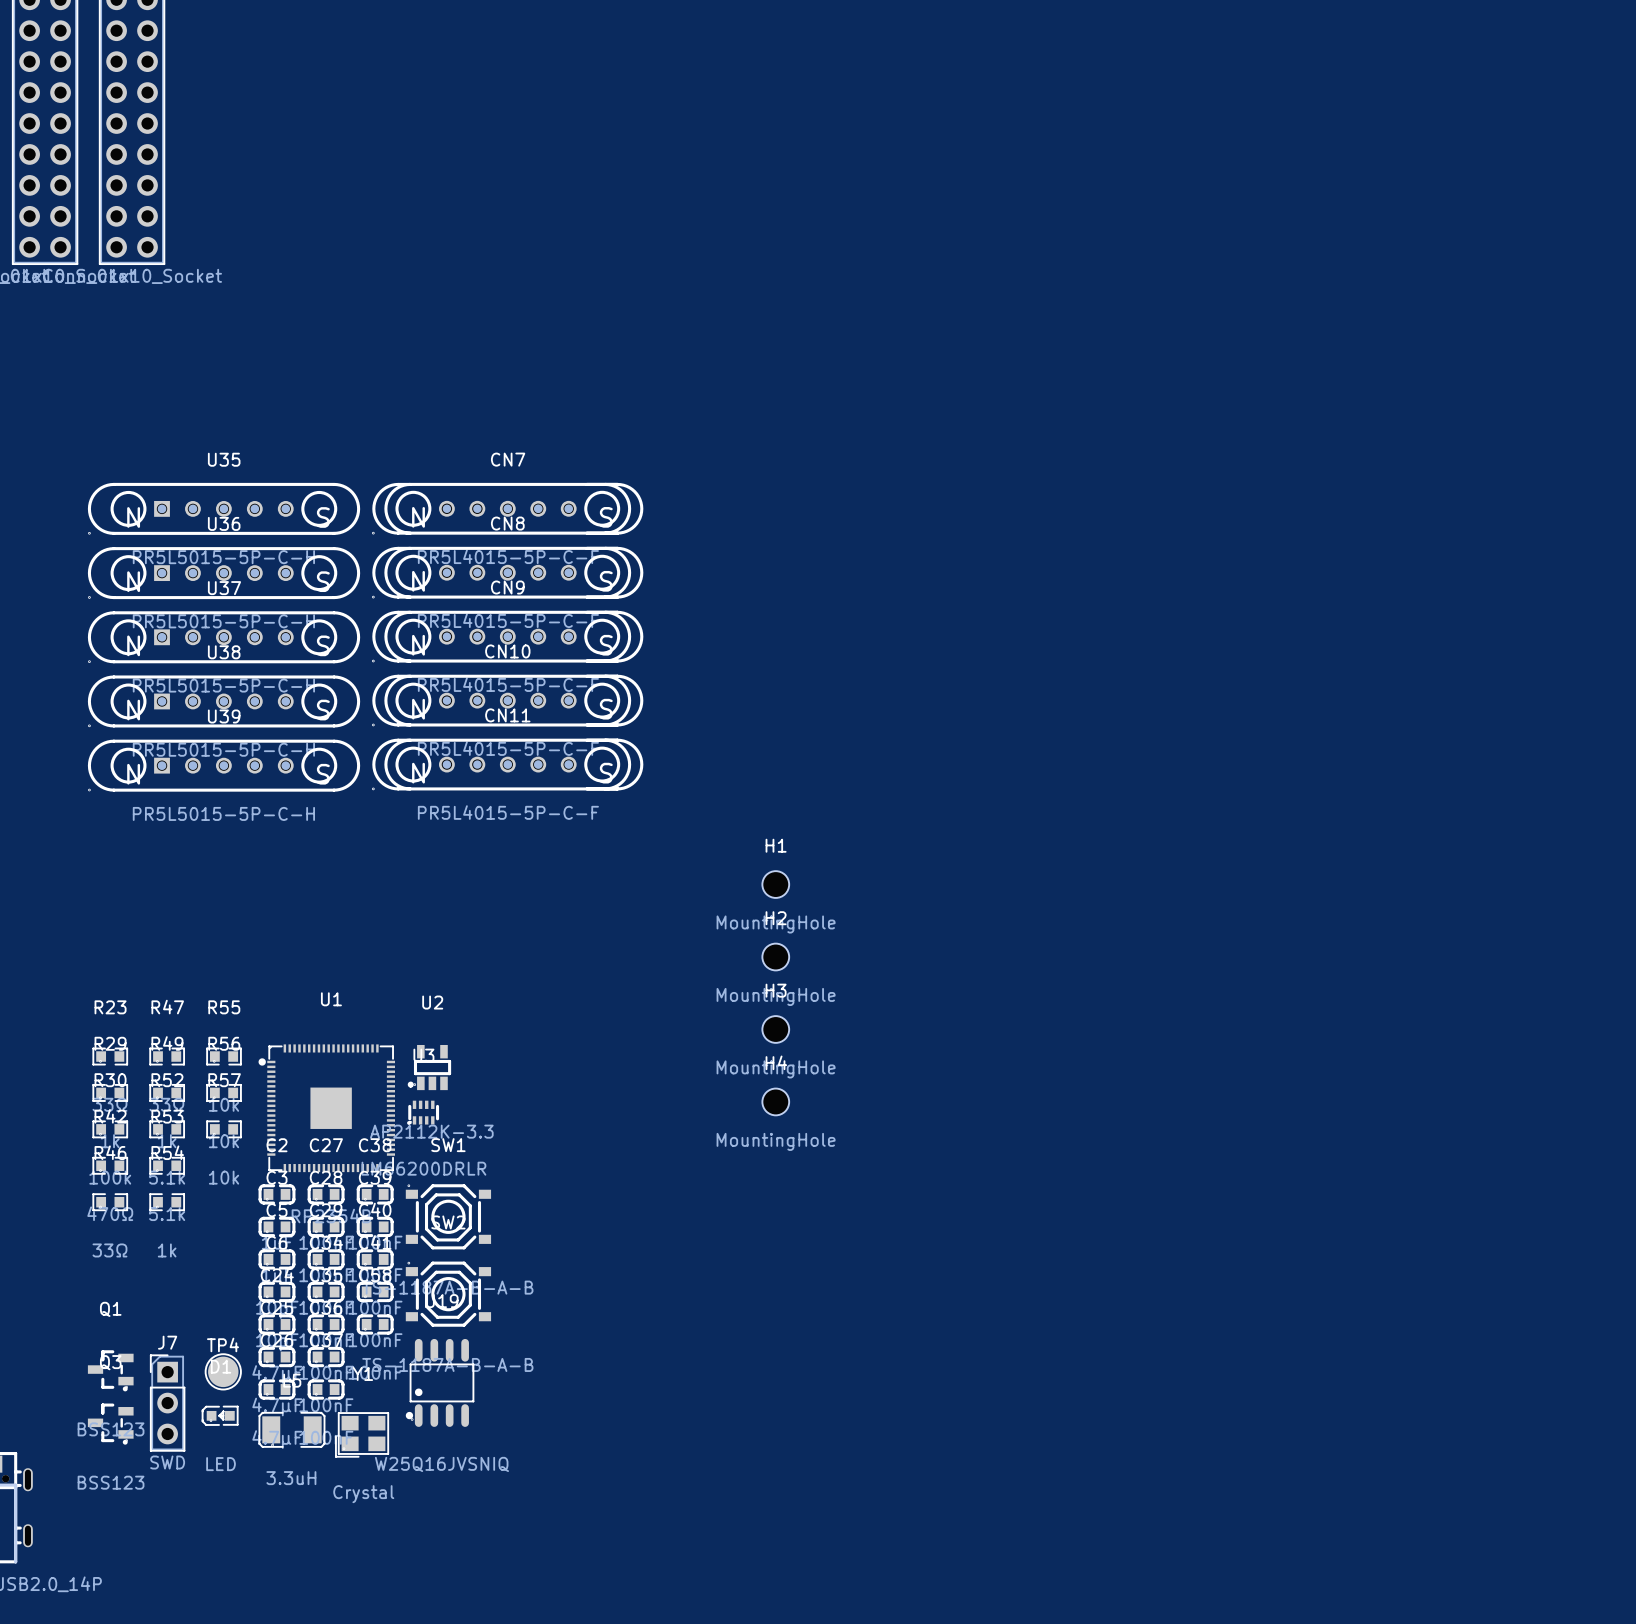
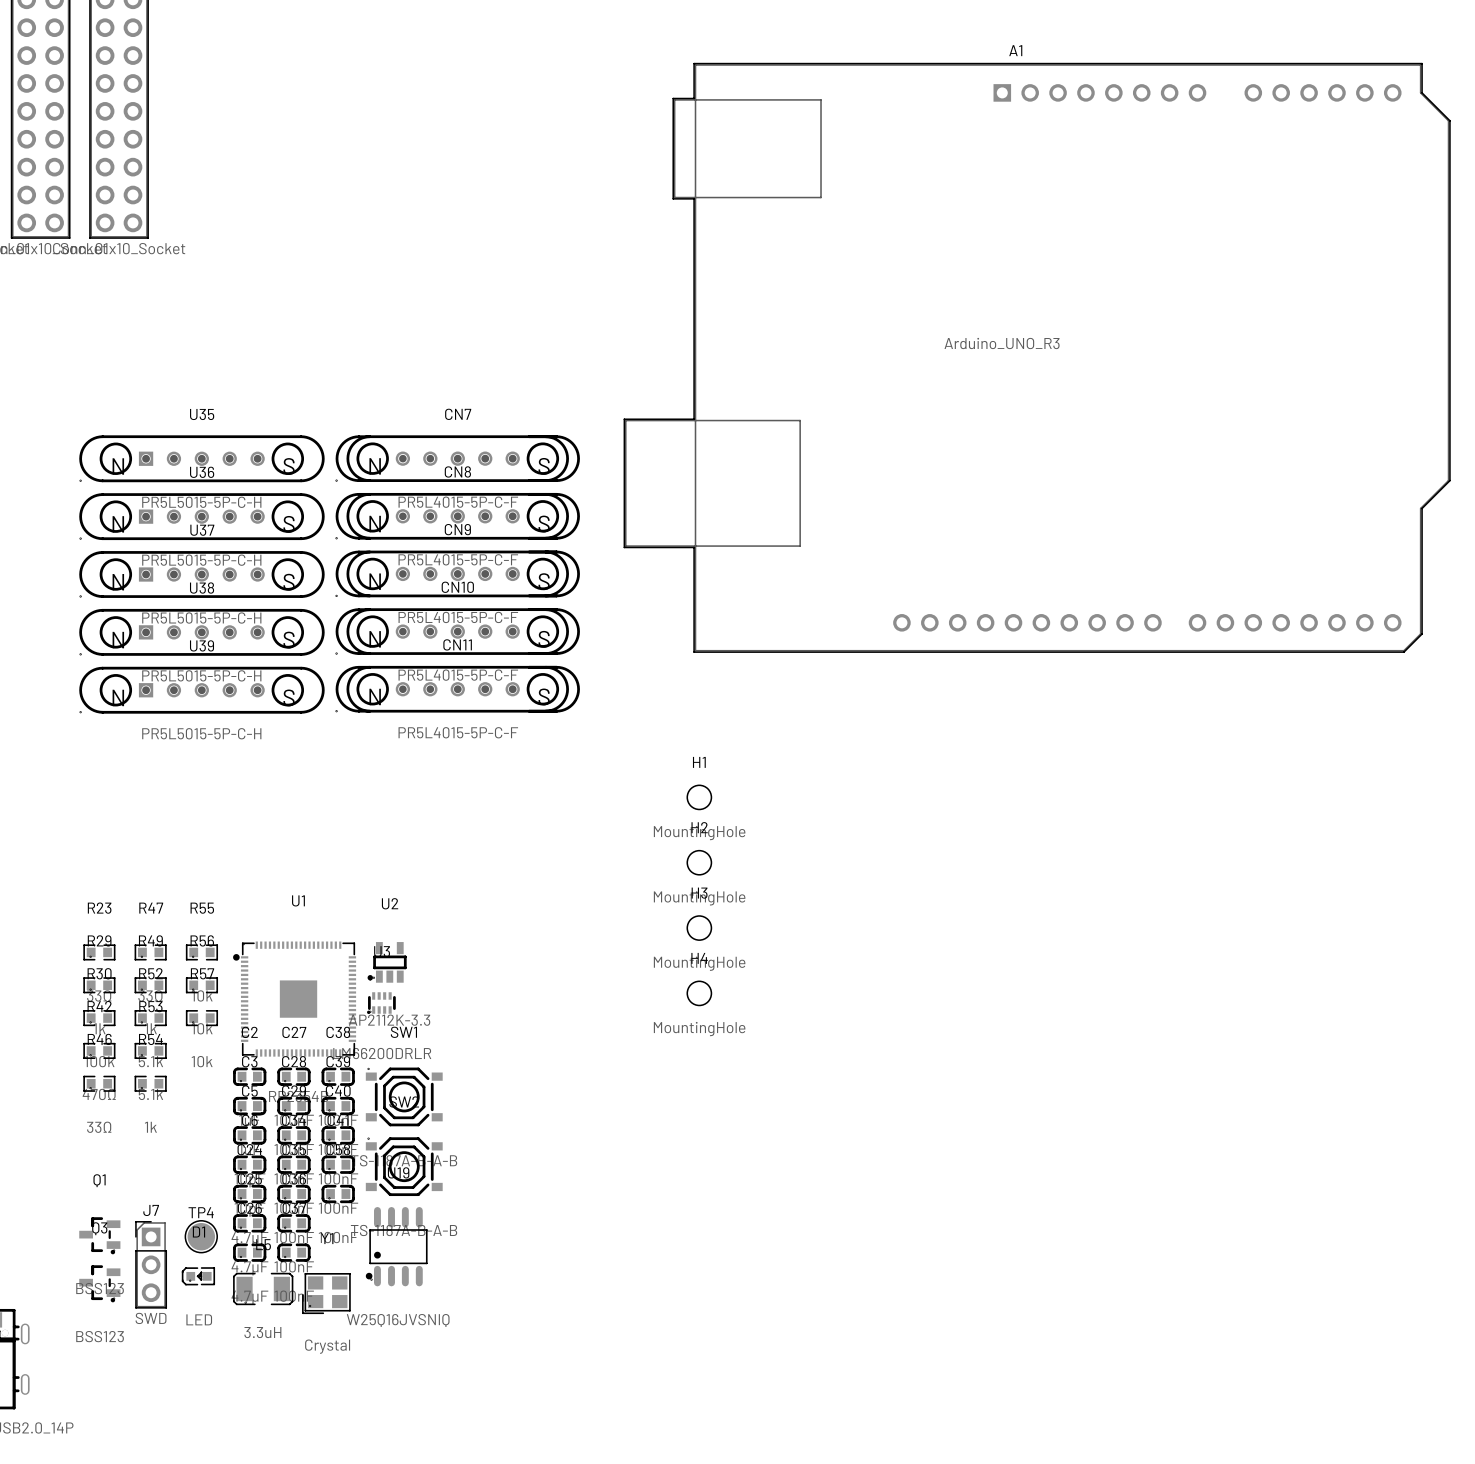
A1: none -> Arduino_UNO_R3 (1037, 357)

